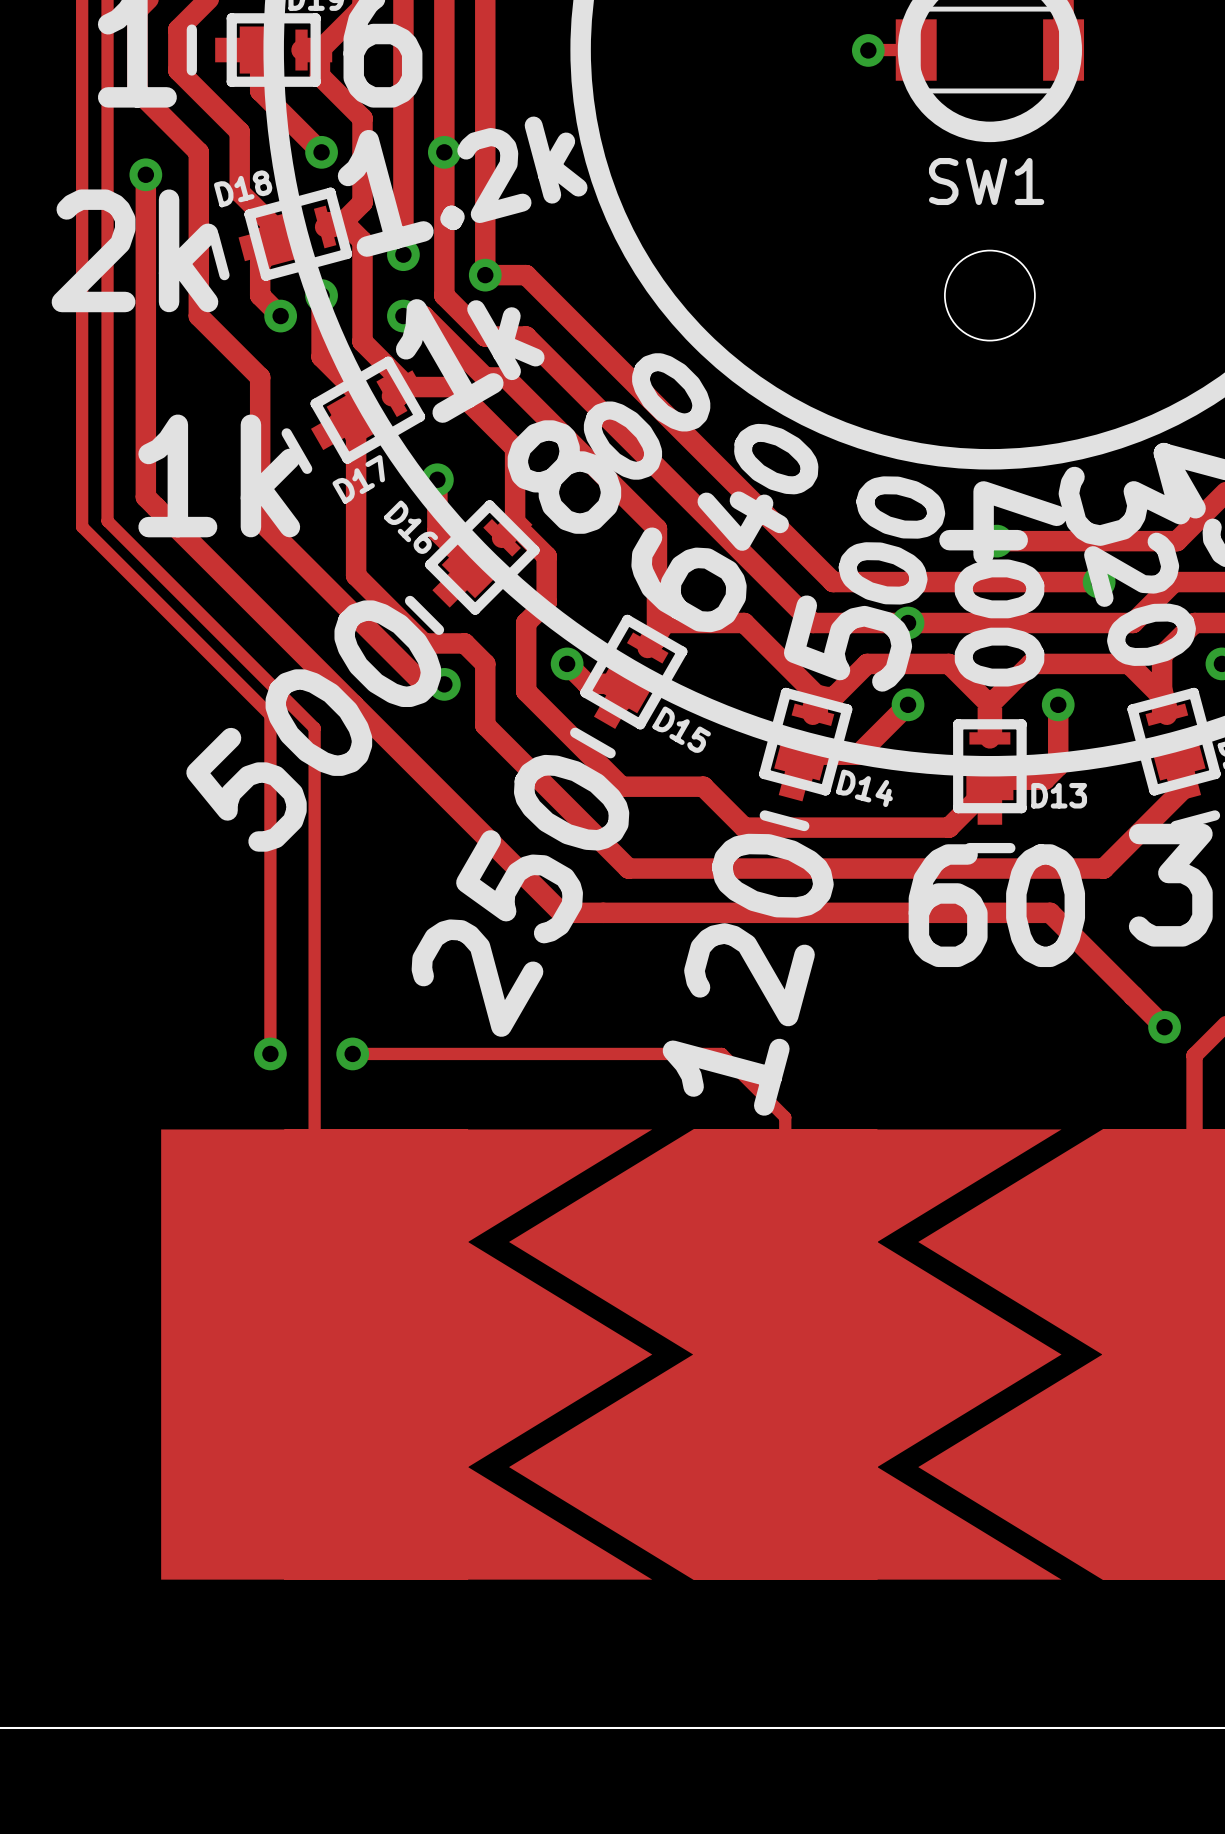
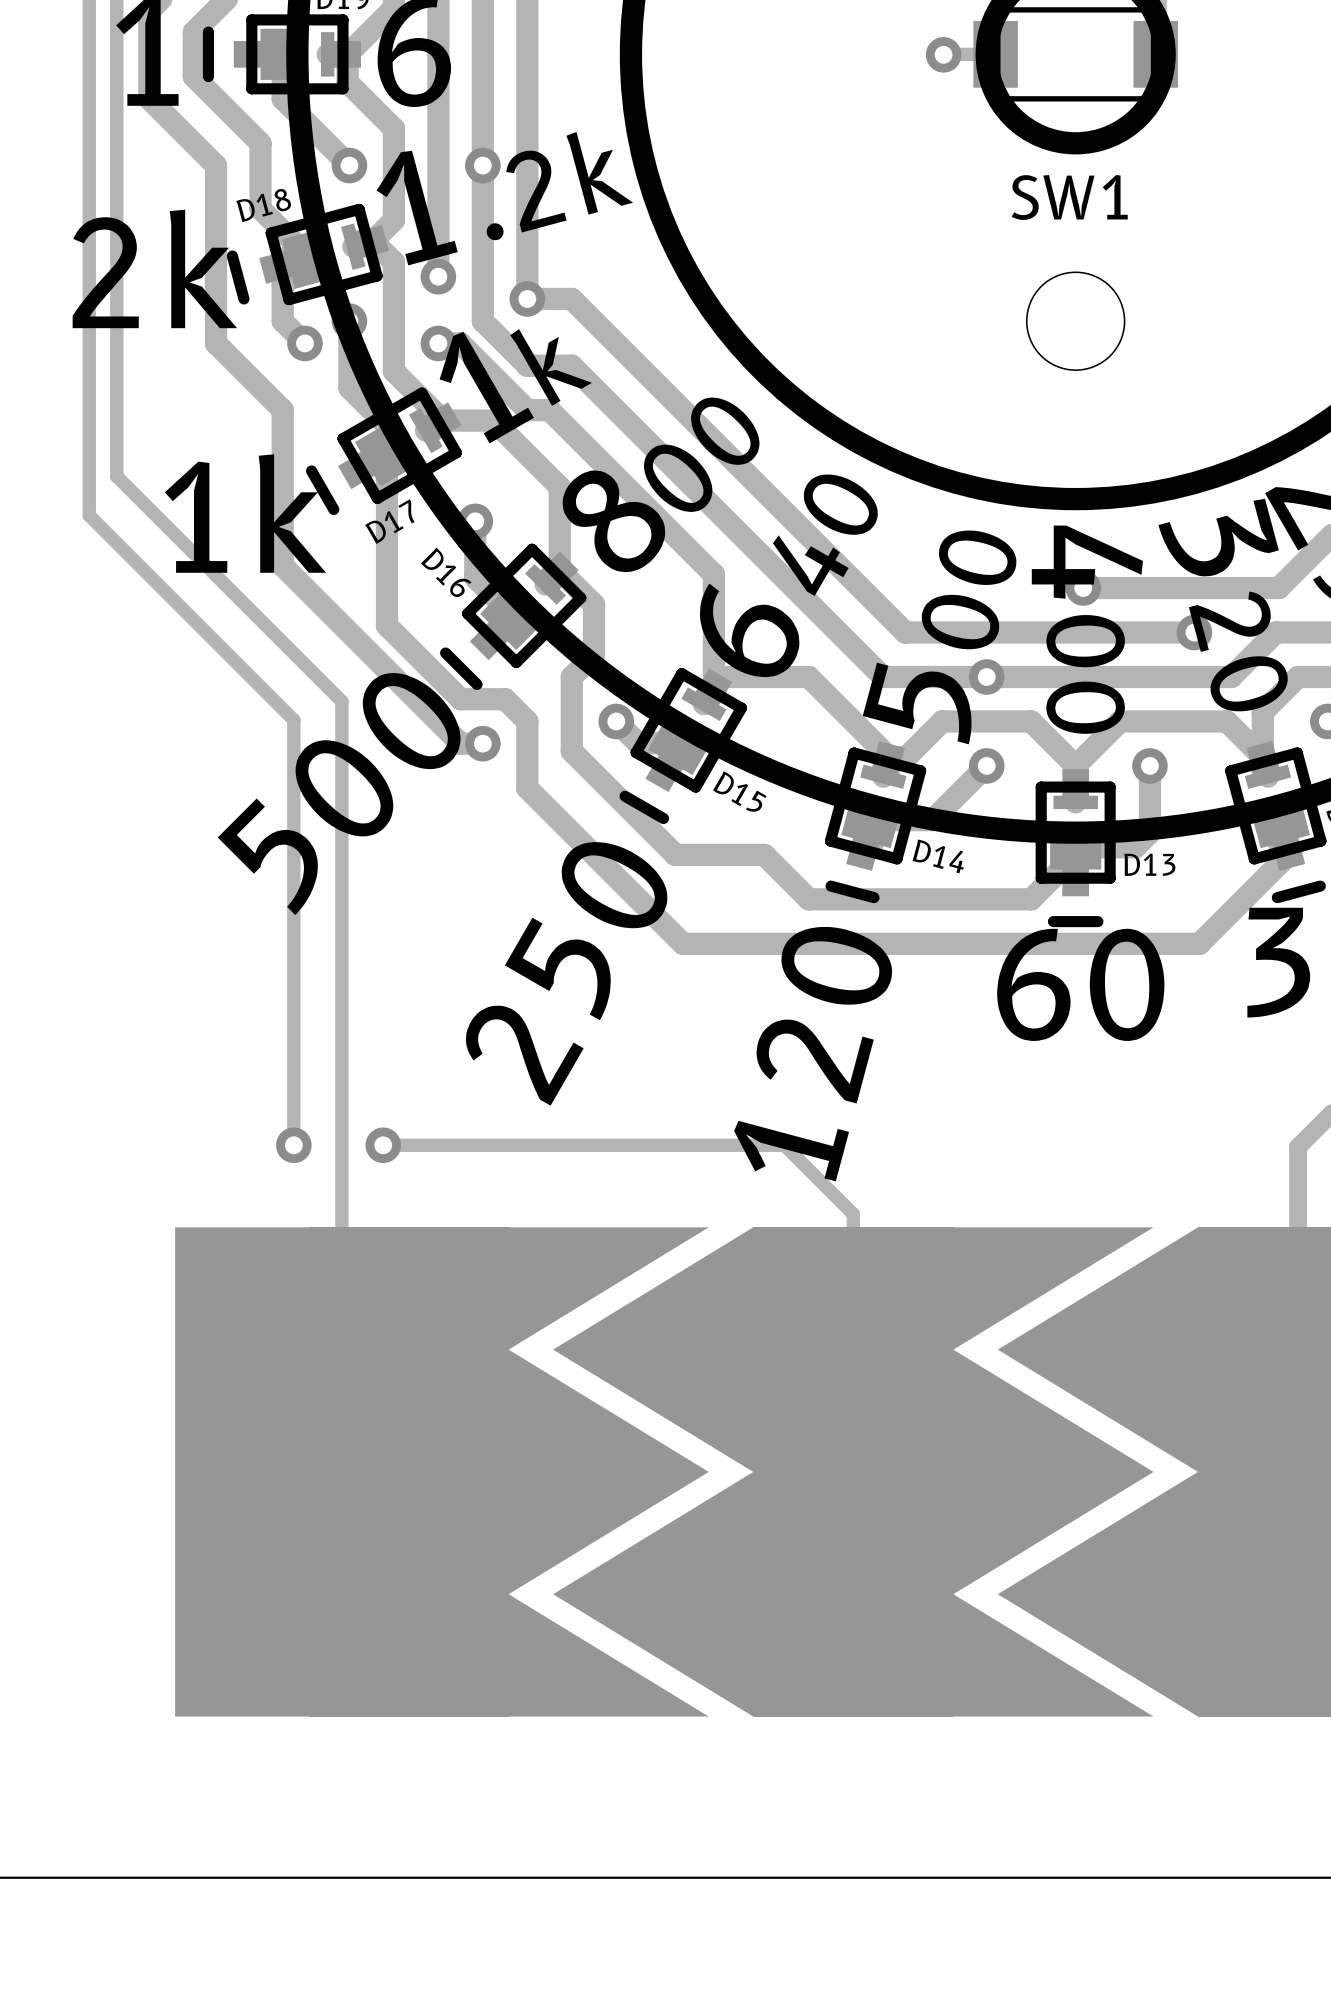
track: (145, 174) (145, 497) (561, 912) (1050, 912) (1164, 1027) -> none
via: (145, 174) -> none
track: (107, 438) (107, 521) (314, 728) -> (116, 476) (341, 701) (341, 791)
track: (82, 474) (82, 526) (270, 715) -> (89, 515) (293, 720) (293, 777)
via: (1164, 1027) -> none

